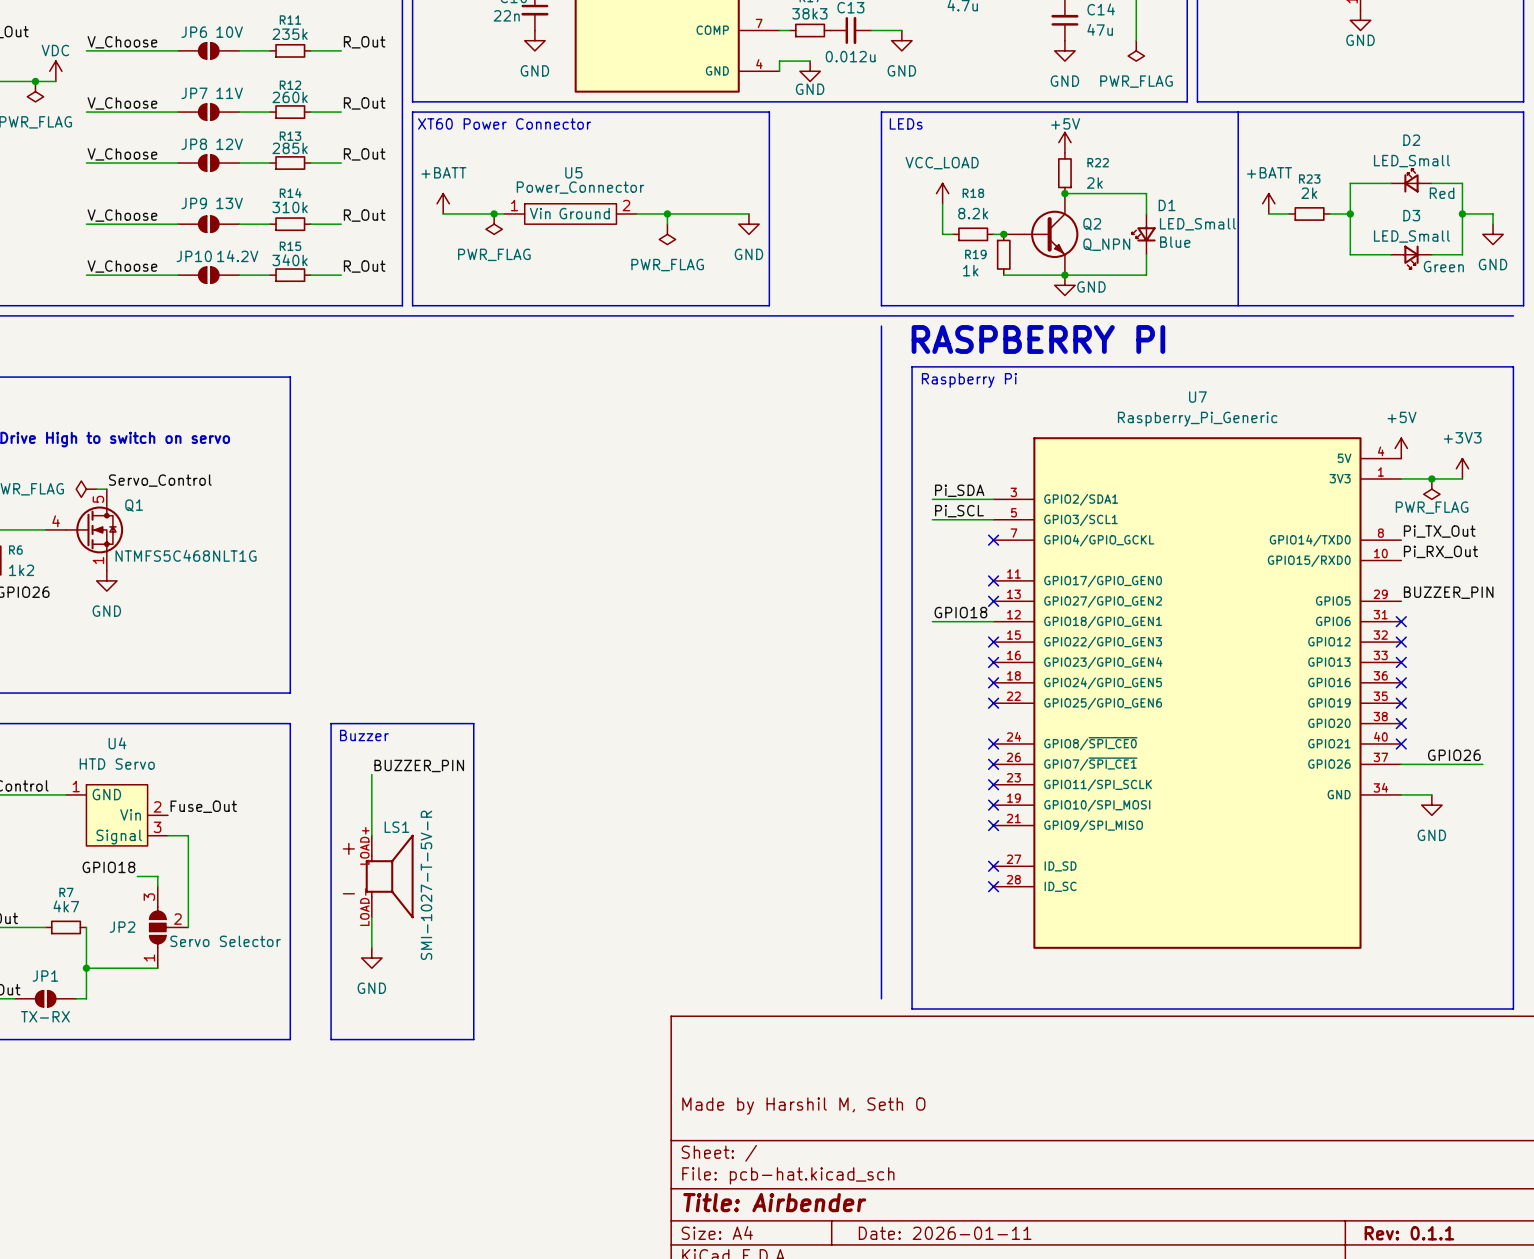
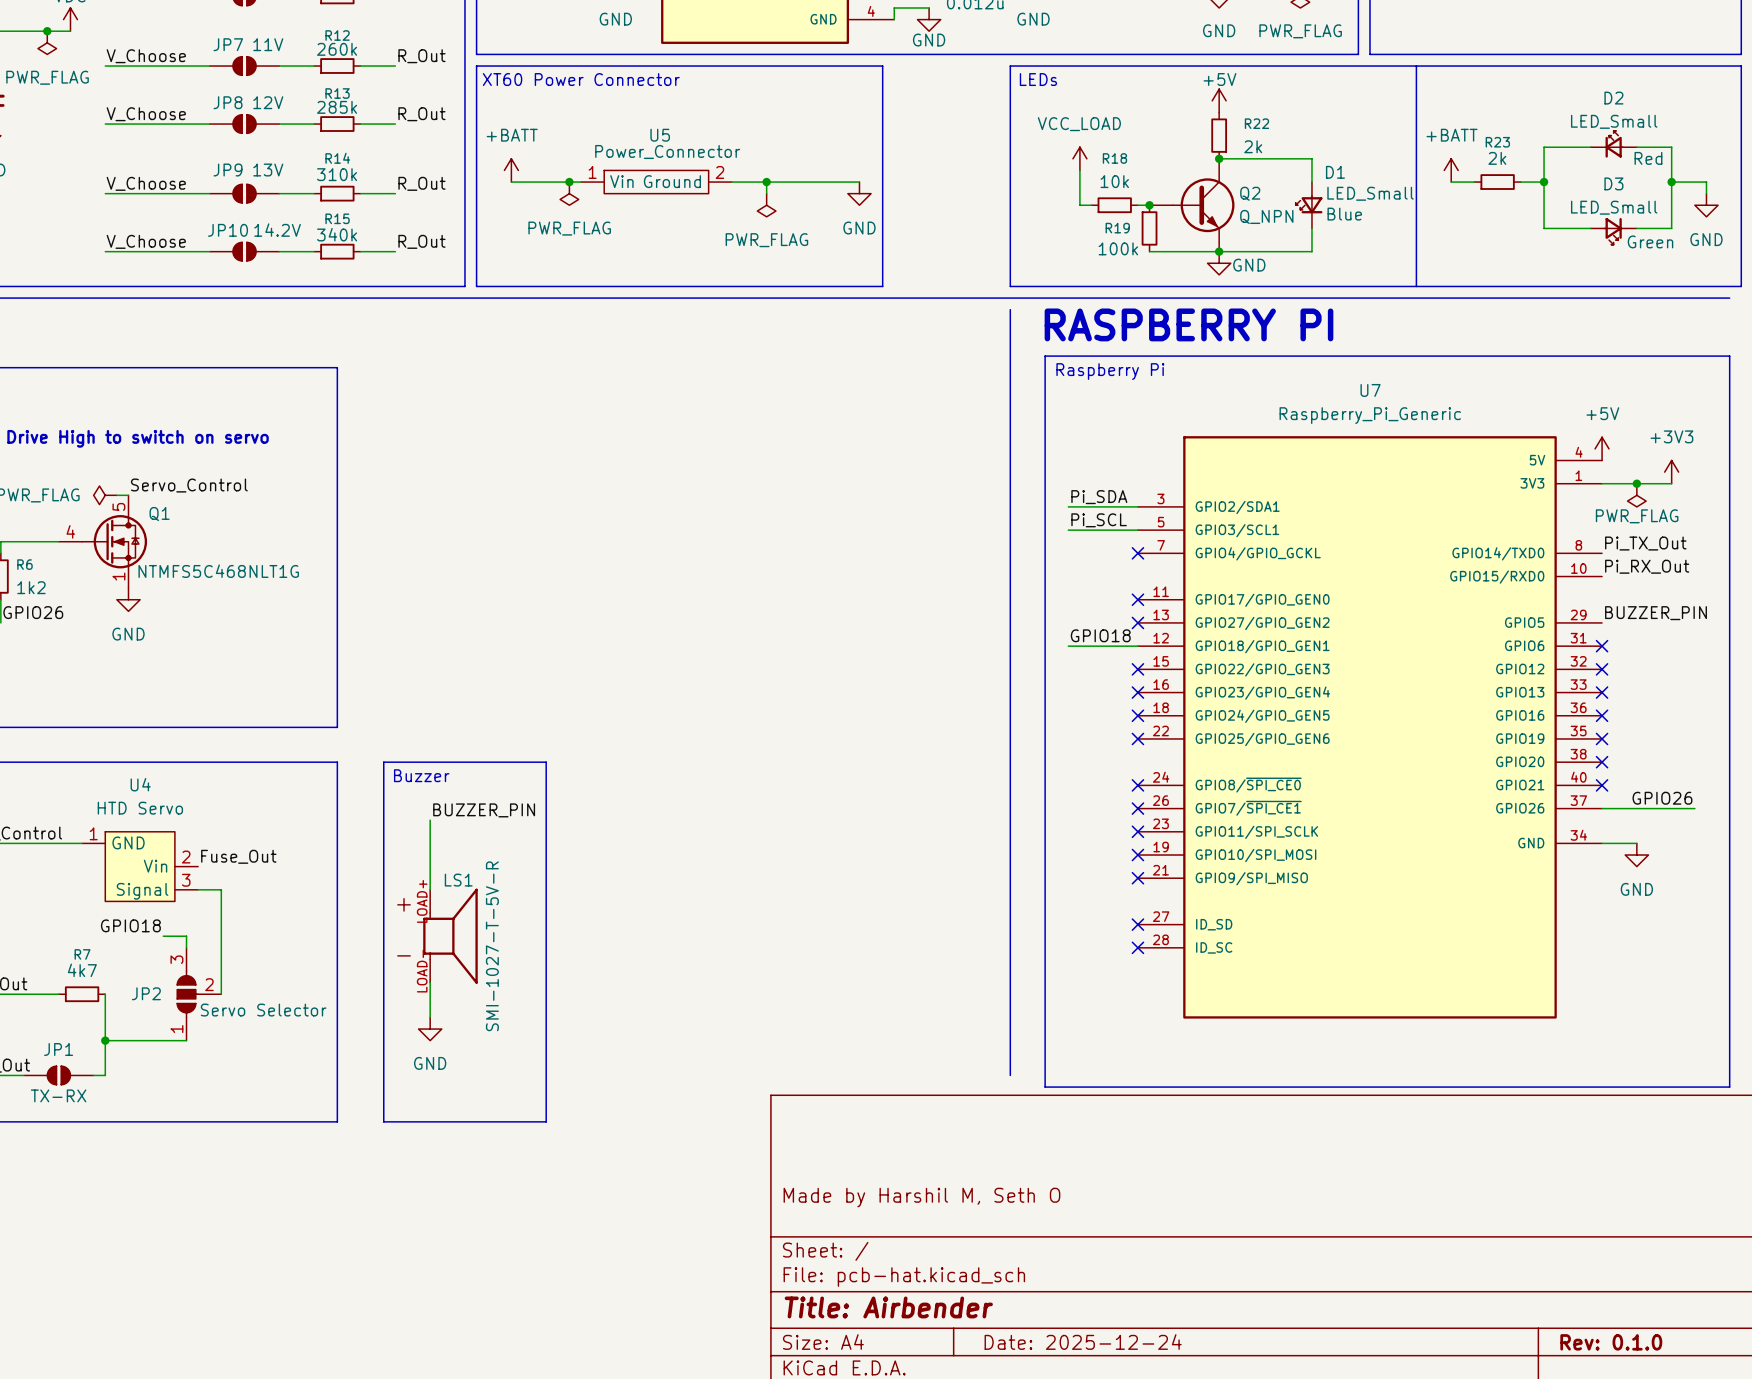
R18 value: 8.2k (973, 213) -> 10k (1114, 181)
R19 value: 1k (970, 270) -> 100k (1118, 248)
title block: Date: 2026-01-11 (945, 1233) -> Date: 2025-12-24 (1083, 1342)
title block: Rev: 0.1.1 (1409, 1233) -> Rev: 0.1.0 (1611, 1342)

